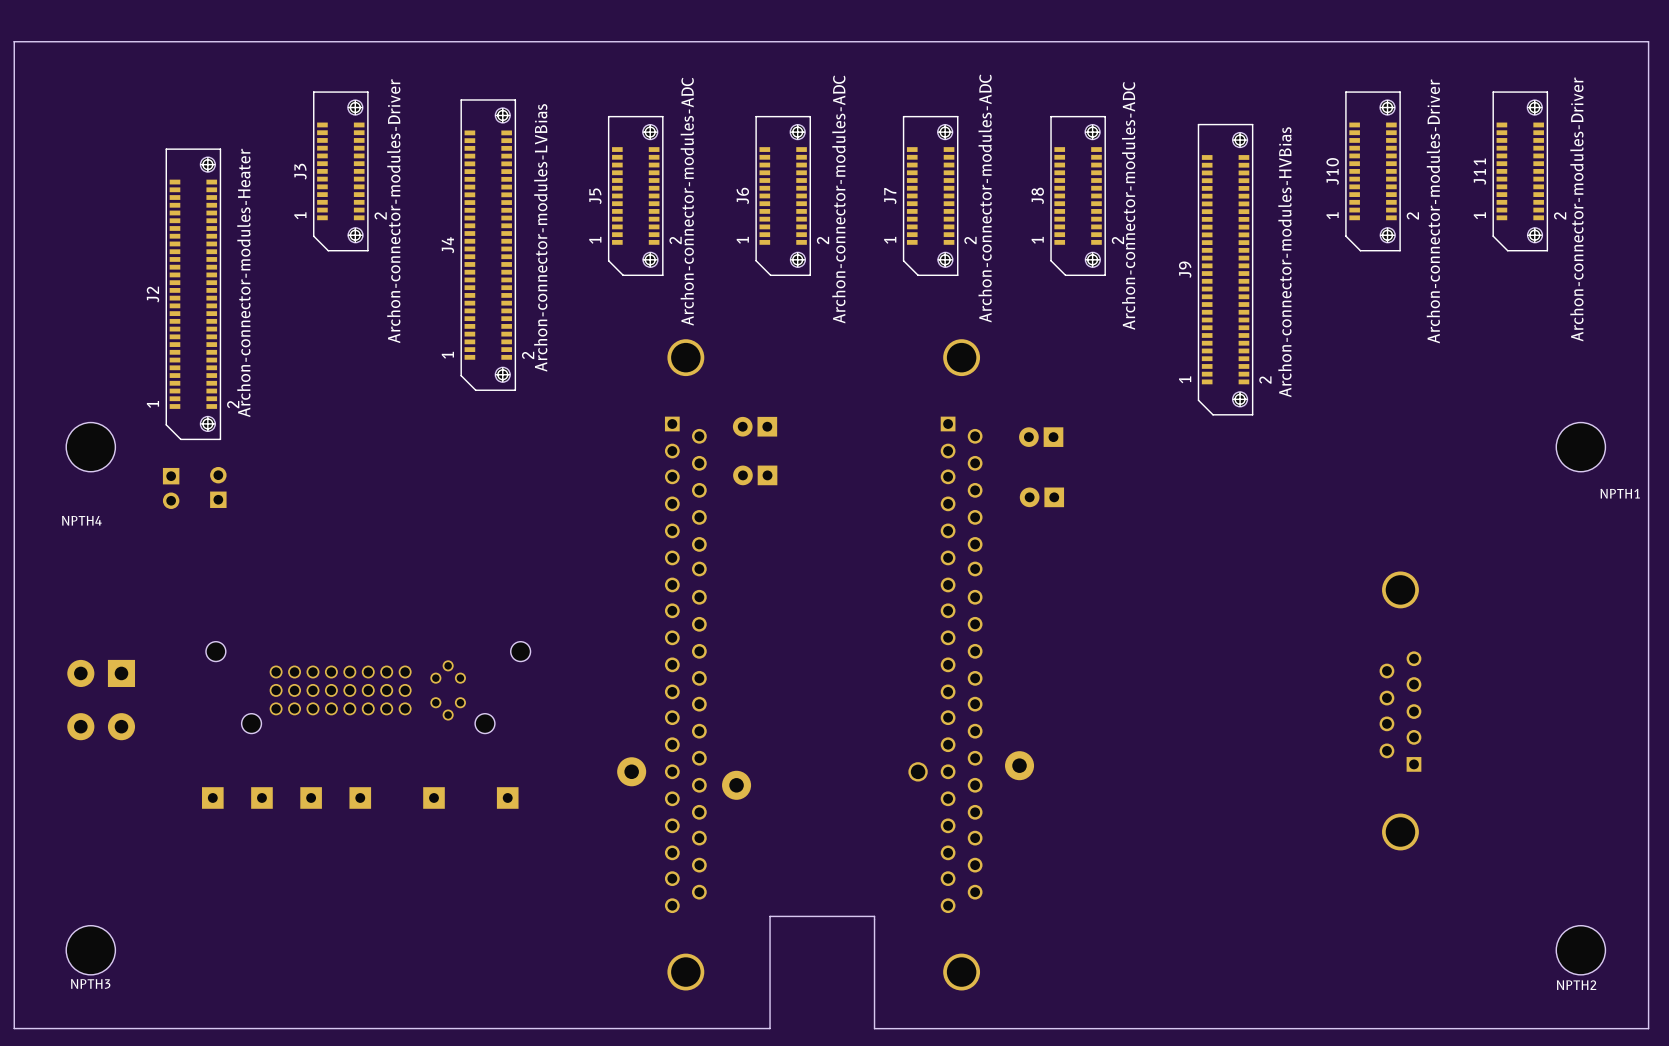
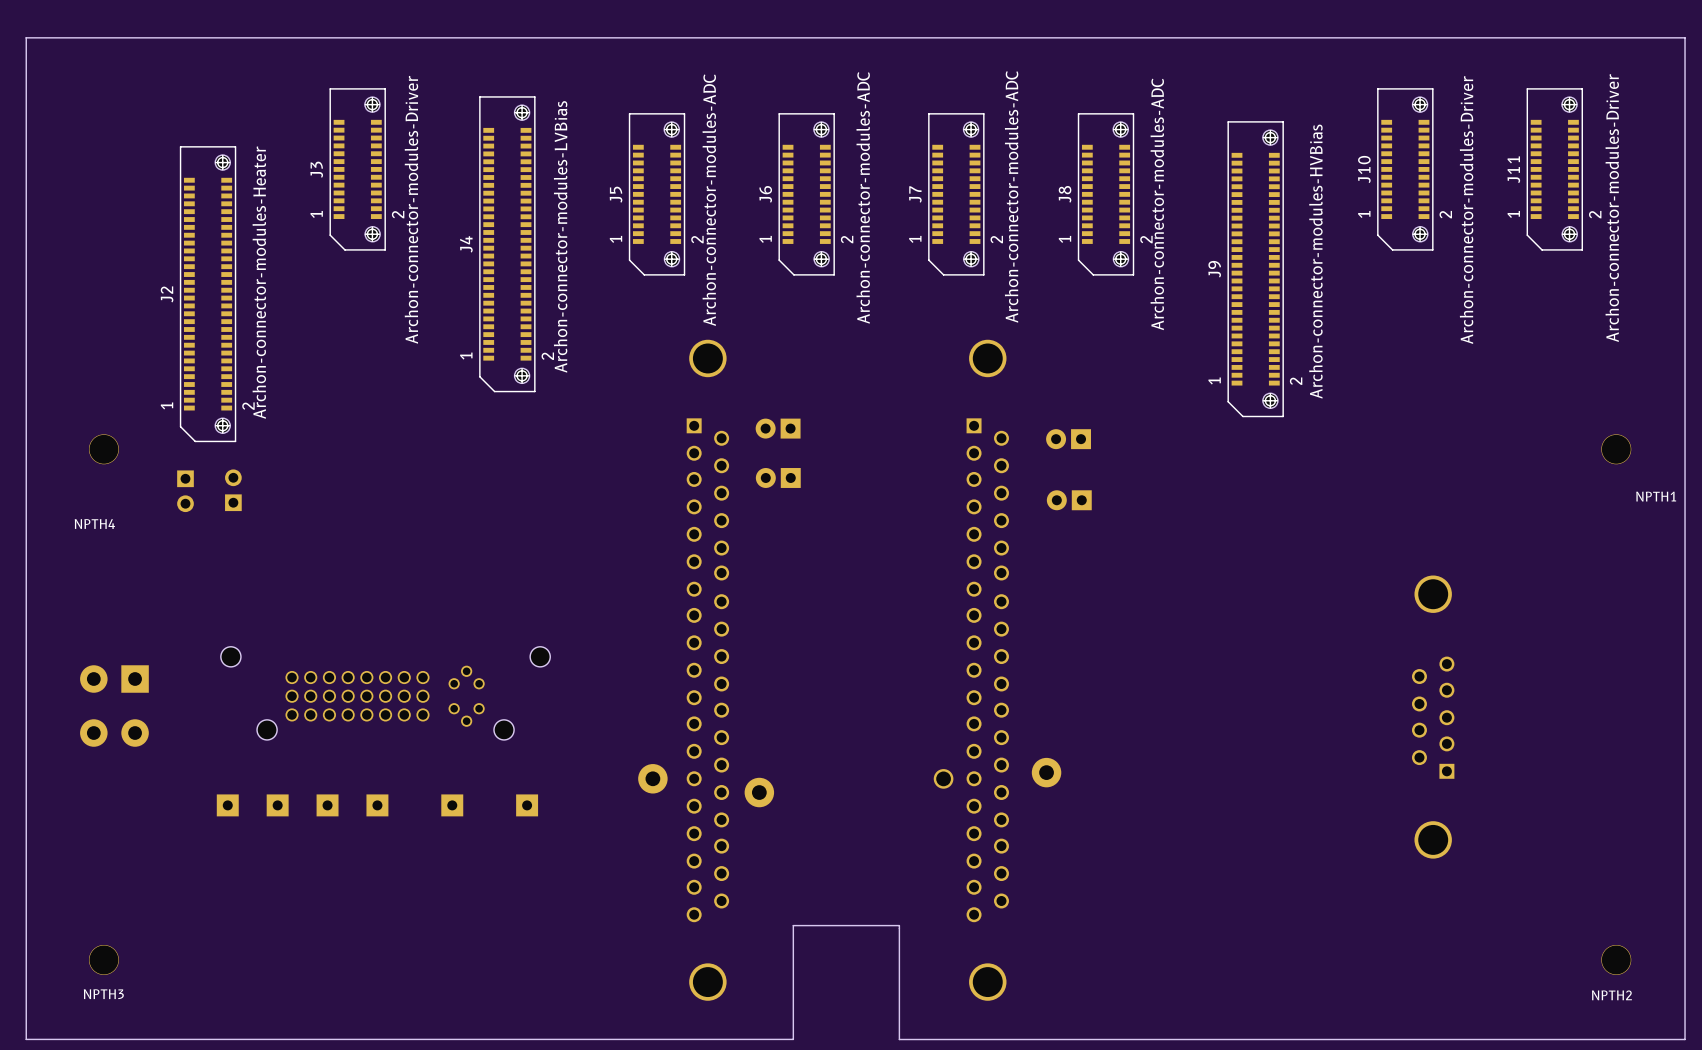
NPTH4 footprint: [66, 422, 116, 472] -> [88, 434, 119, 465]
NPTH1 footprint: [1556, 422, 1606, 472] -> [1601, 434, 1632, 465]
NPTH3 footprint: [66, 925, 116, 975] -> [88, 945, 119, 975]
NPTH2 footprint: [1556, 925, 1606, 975] -> [1601, 945, 1632, 975]

